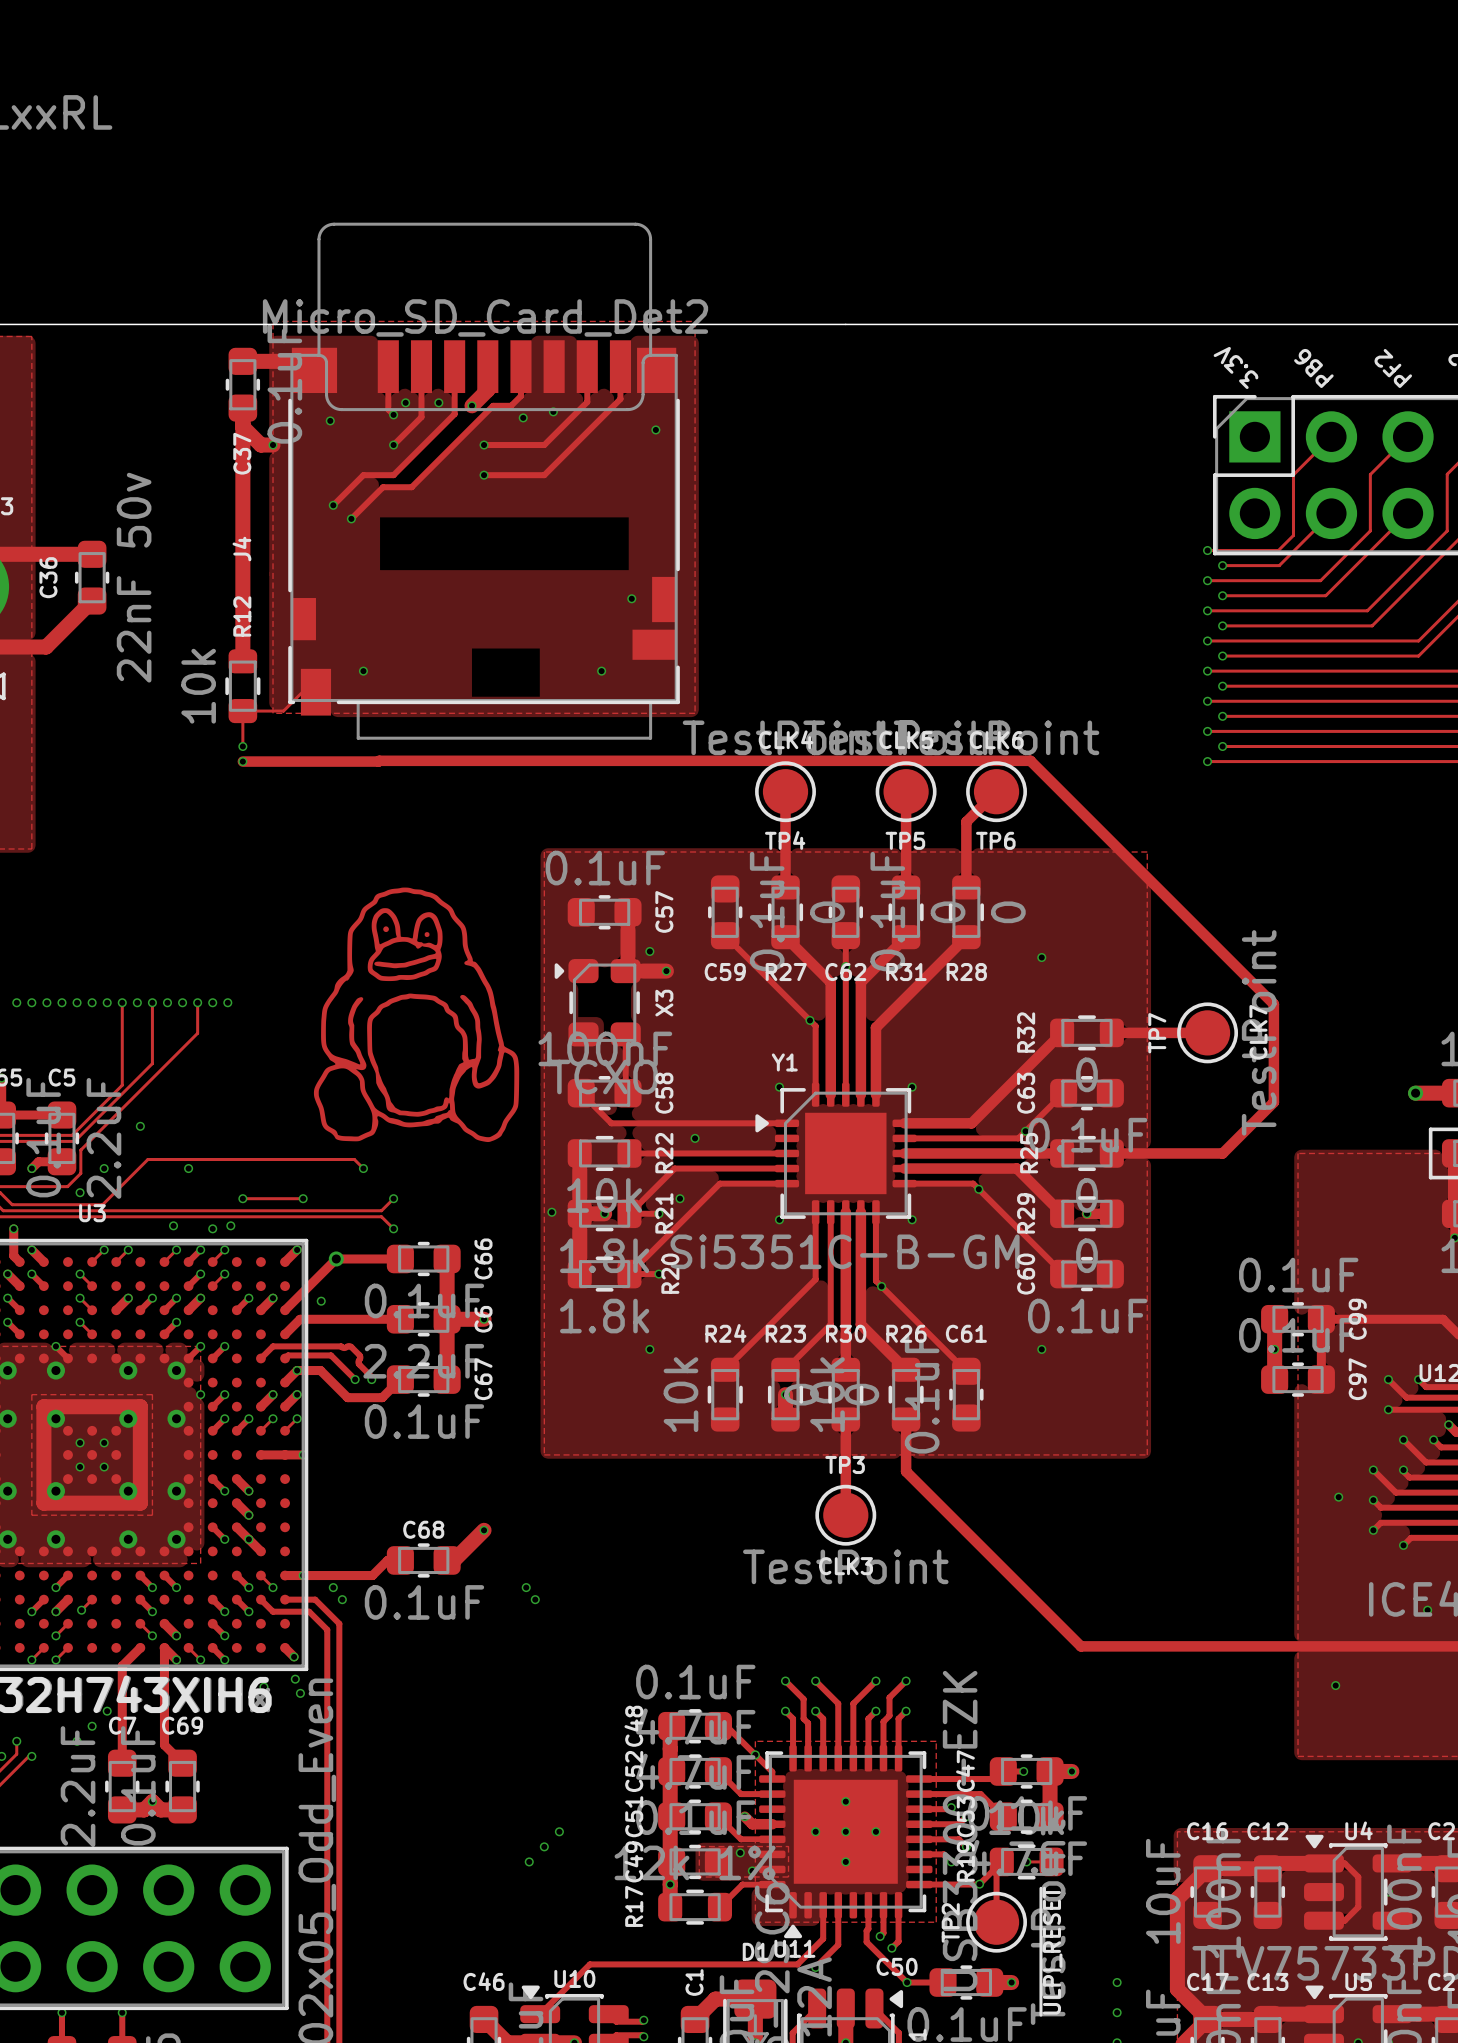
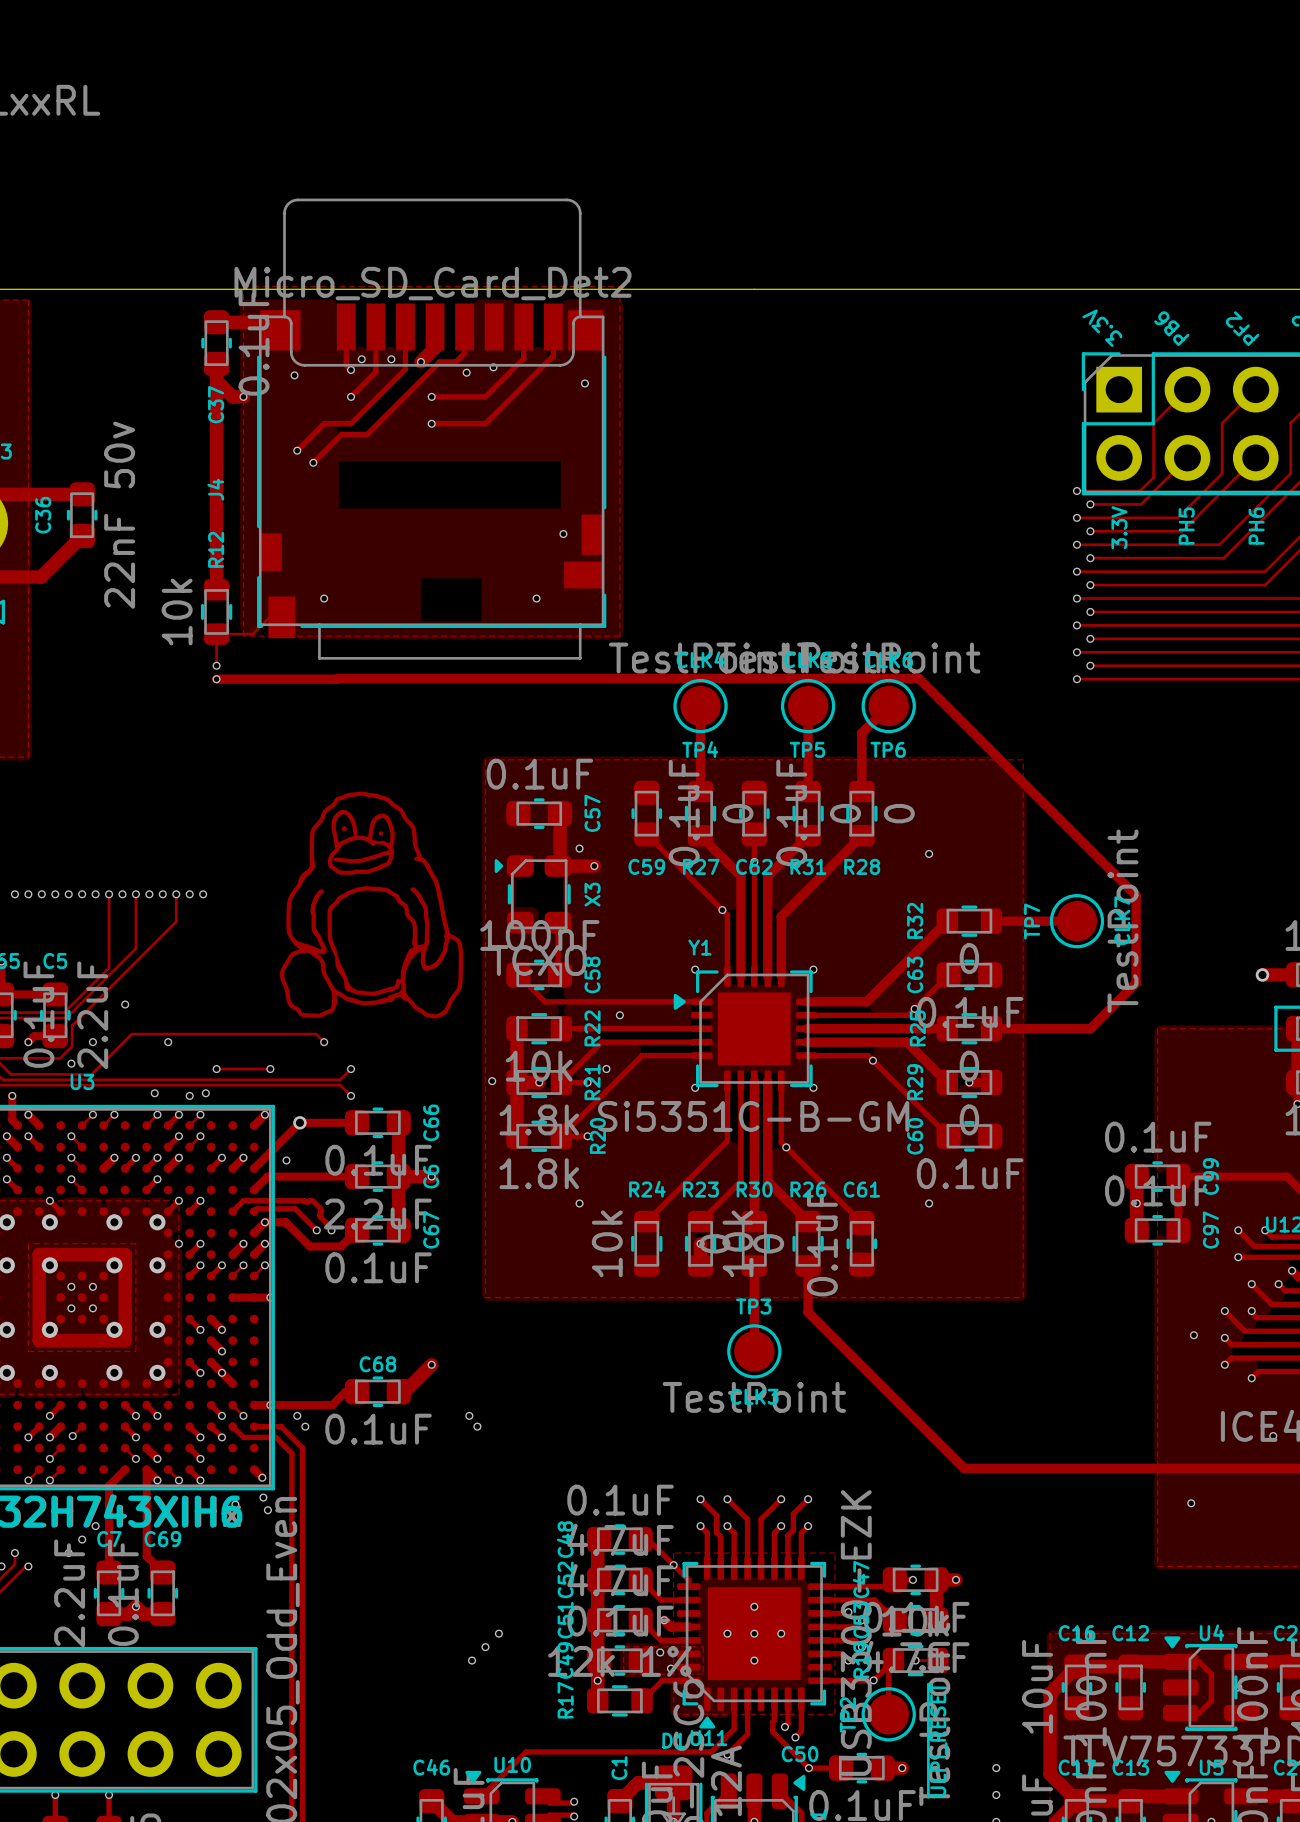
text: none -> PH5 (1186, 526)
text: none -> PH6 (1256, 526)
text: none -> 3.3V (1119, 527)

